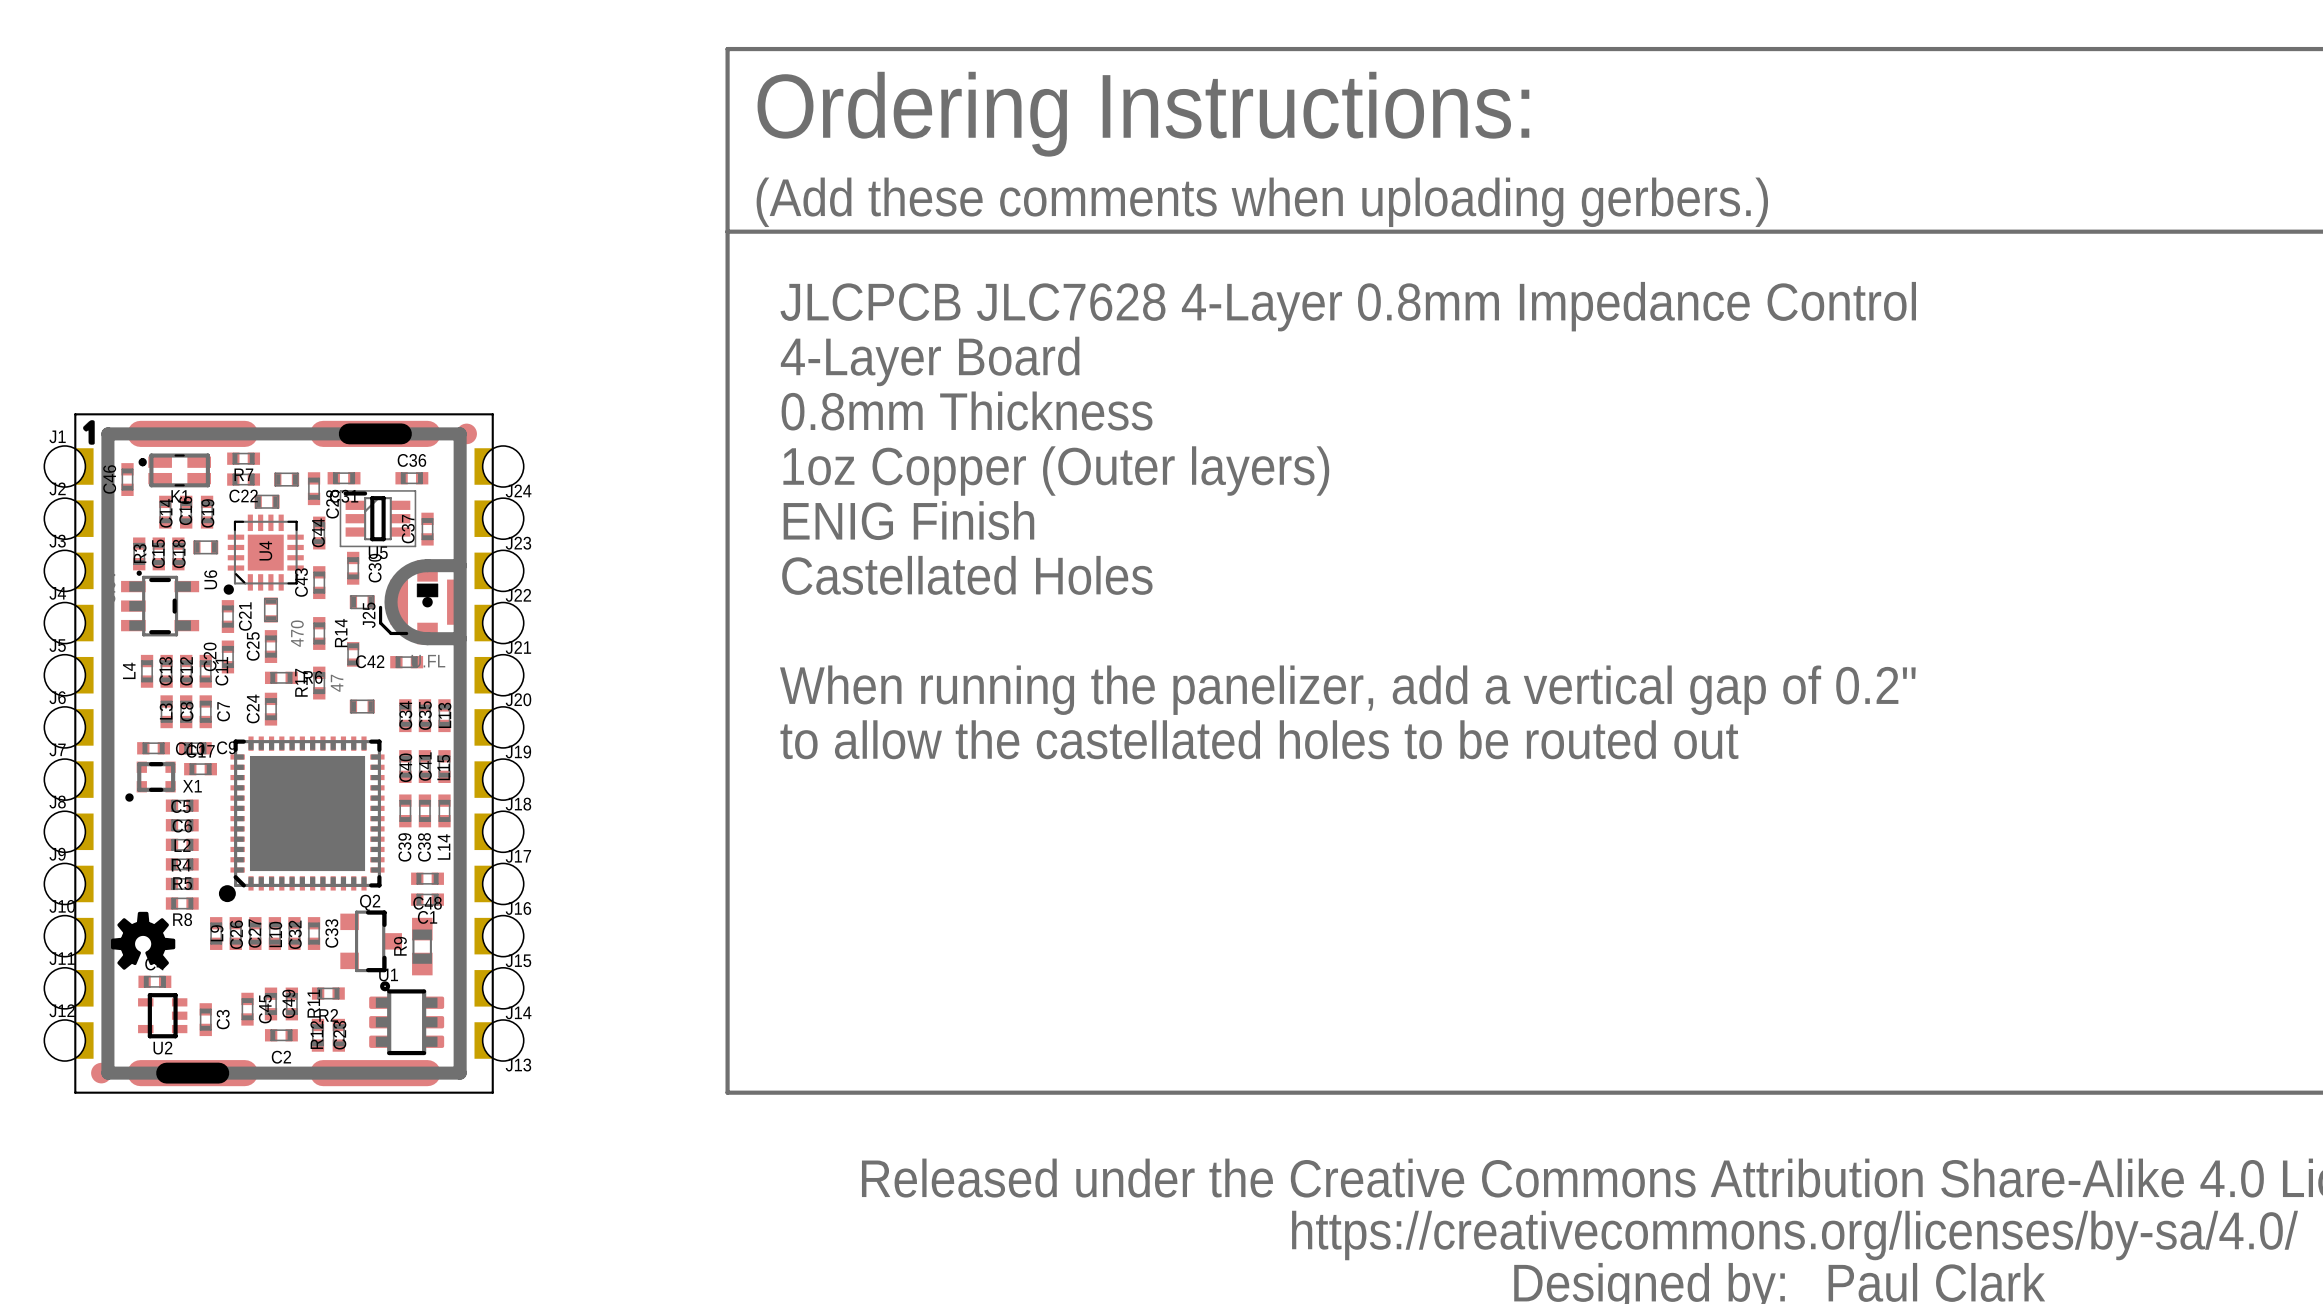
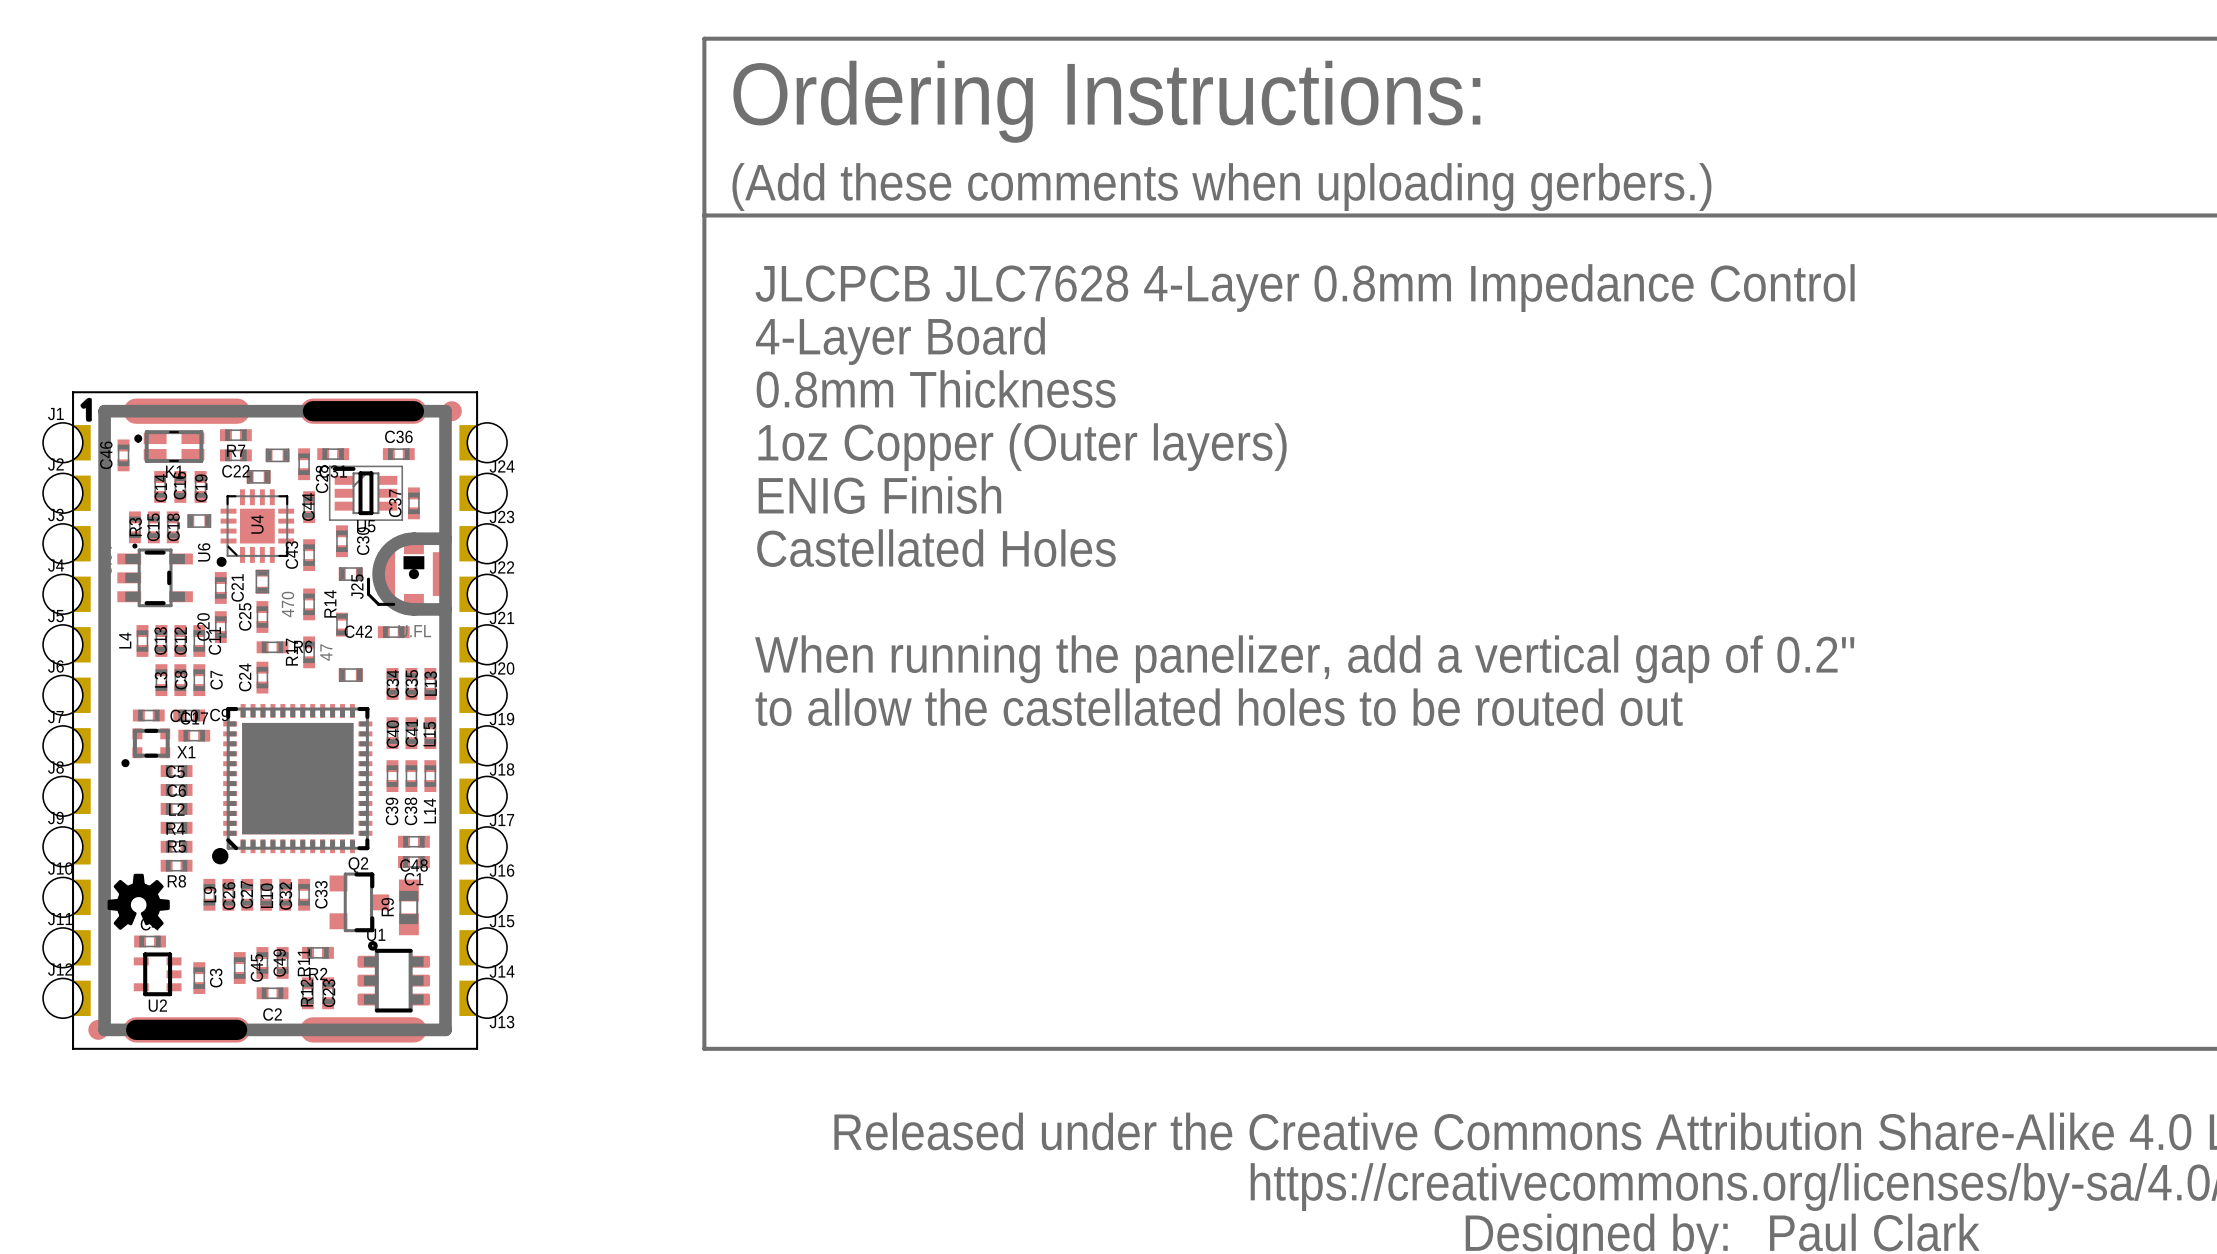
part footprint: [101, 420, 467, 1087] -> [98, 398, 452, 1043]

